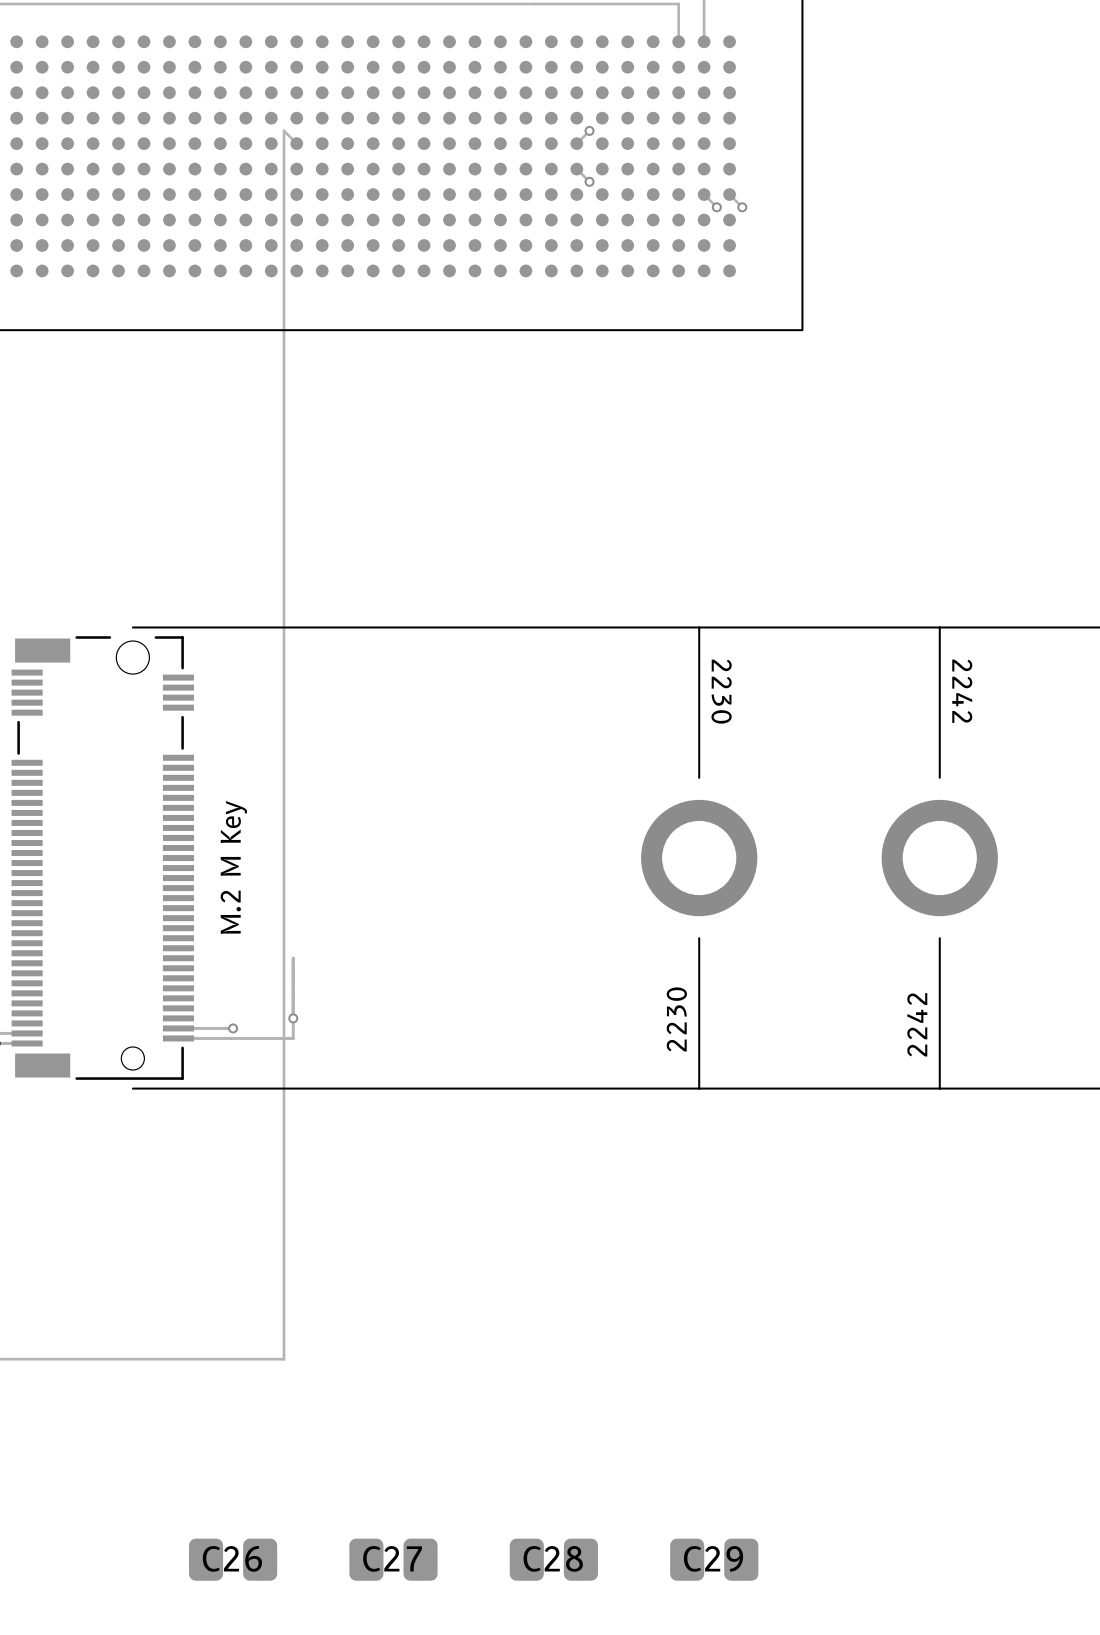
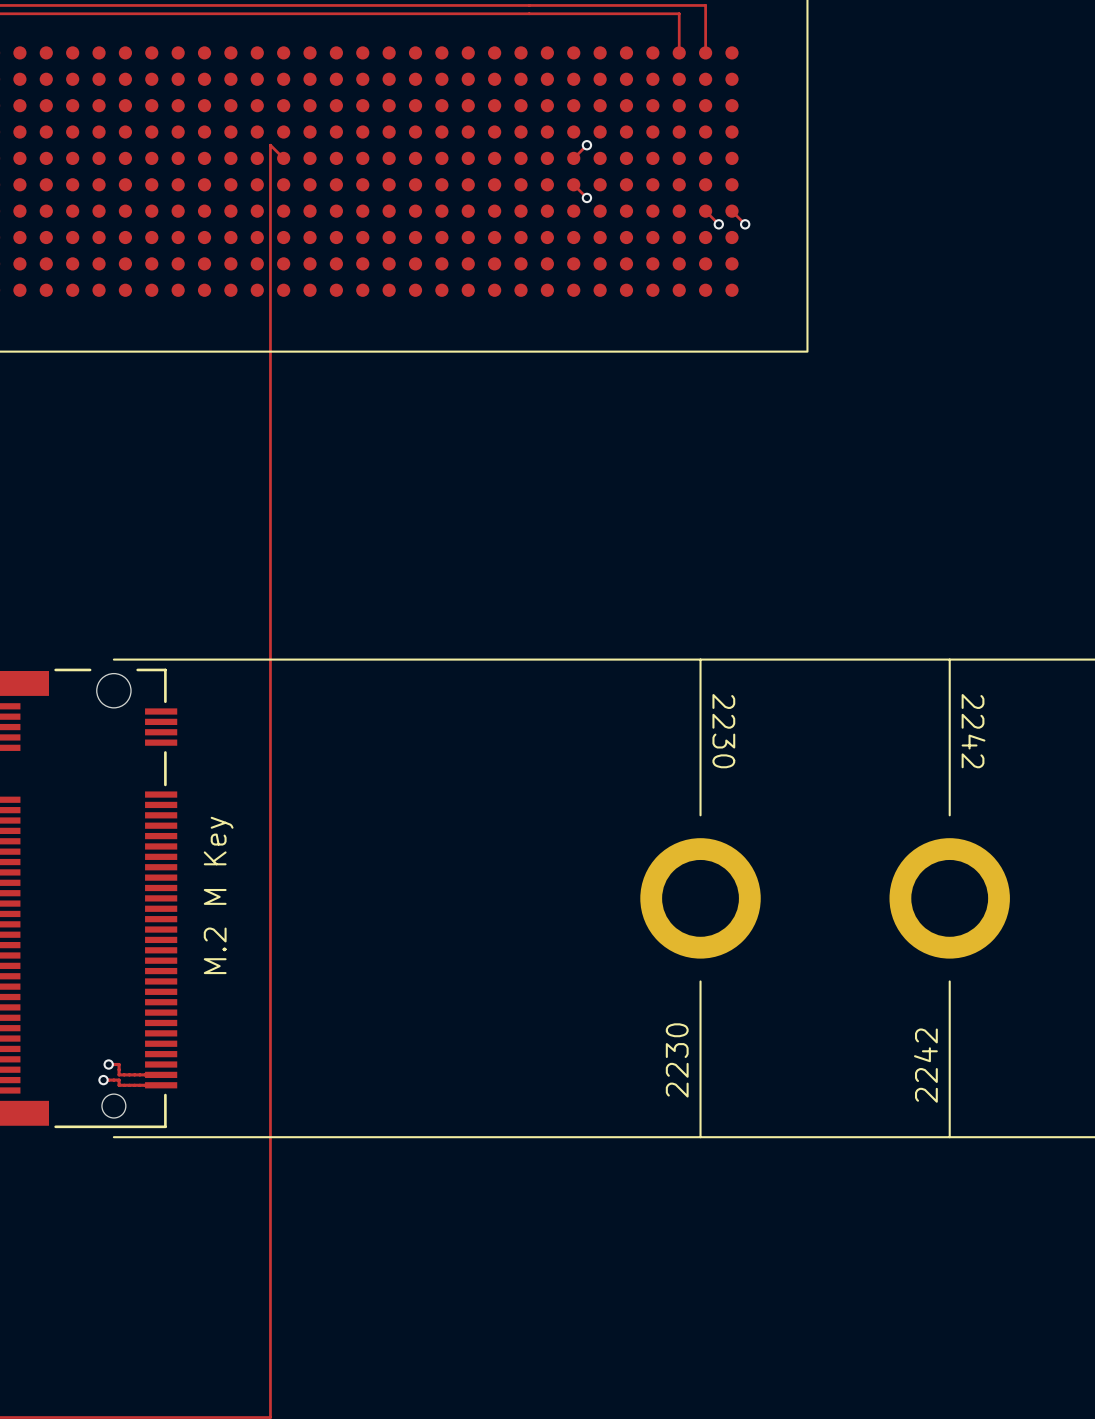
track: (293, 958) (293, 1038) (178, 1038) -> (103, 1080) (119, 1080) (119, 1085) (160, 1085)
via: none -> (108, 1064)
via: (293, 1018) -> none
track: (178, 1028) (233, 1028) -> (160, 1074) (119, 1074) (119, 1064) (108, 1064)
via: (233, 1028) -> none
via: none -> (103, 1080)

